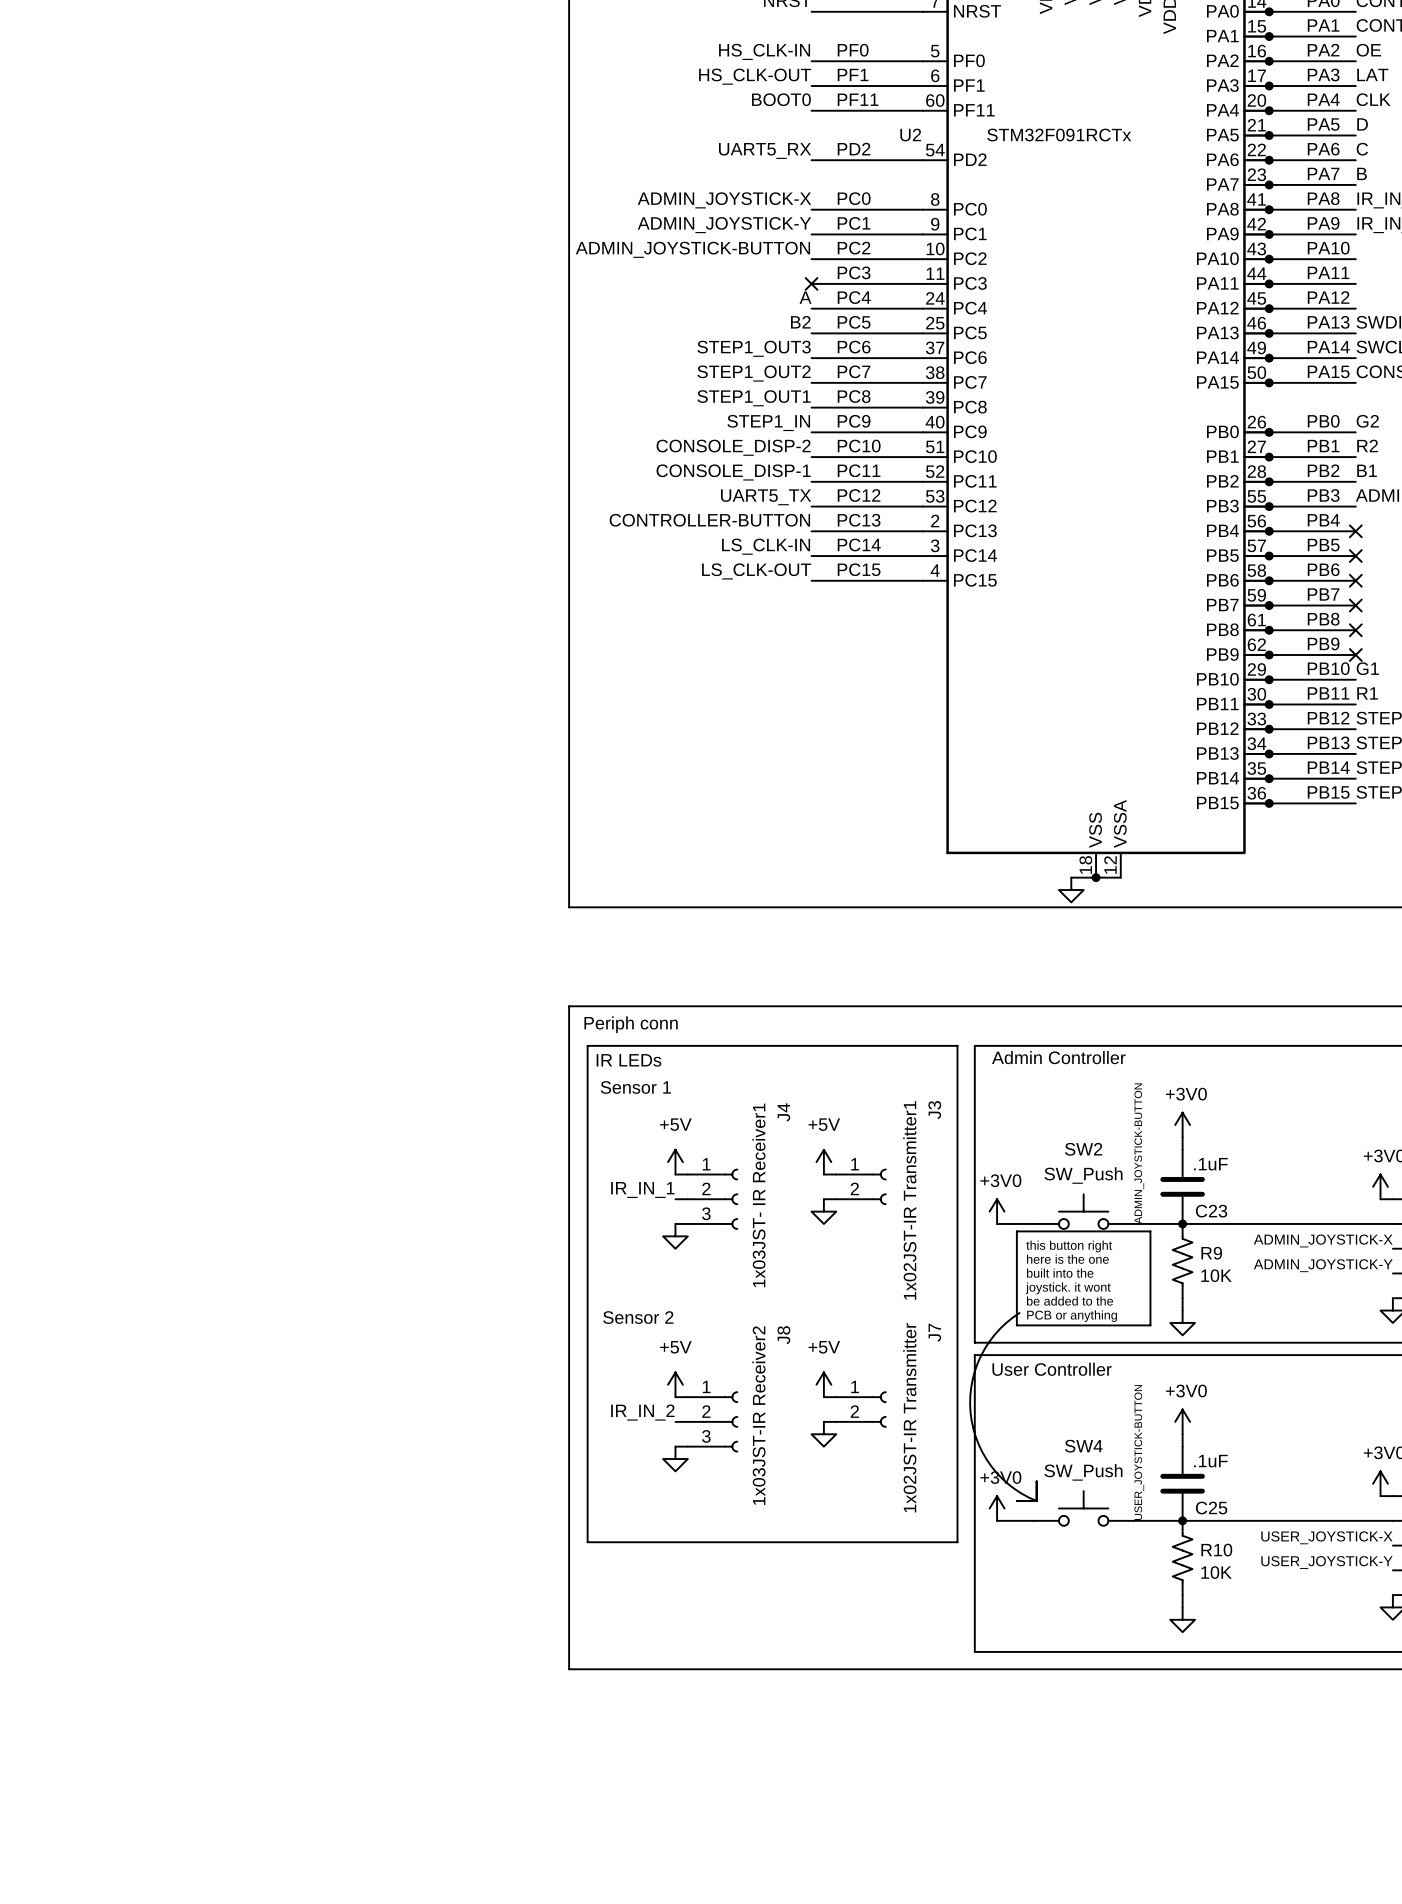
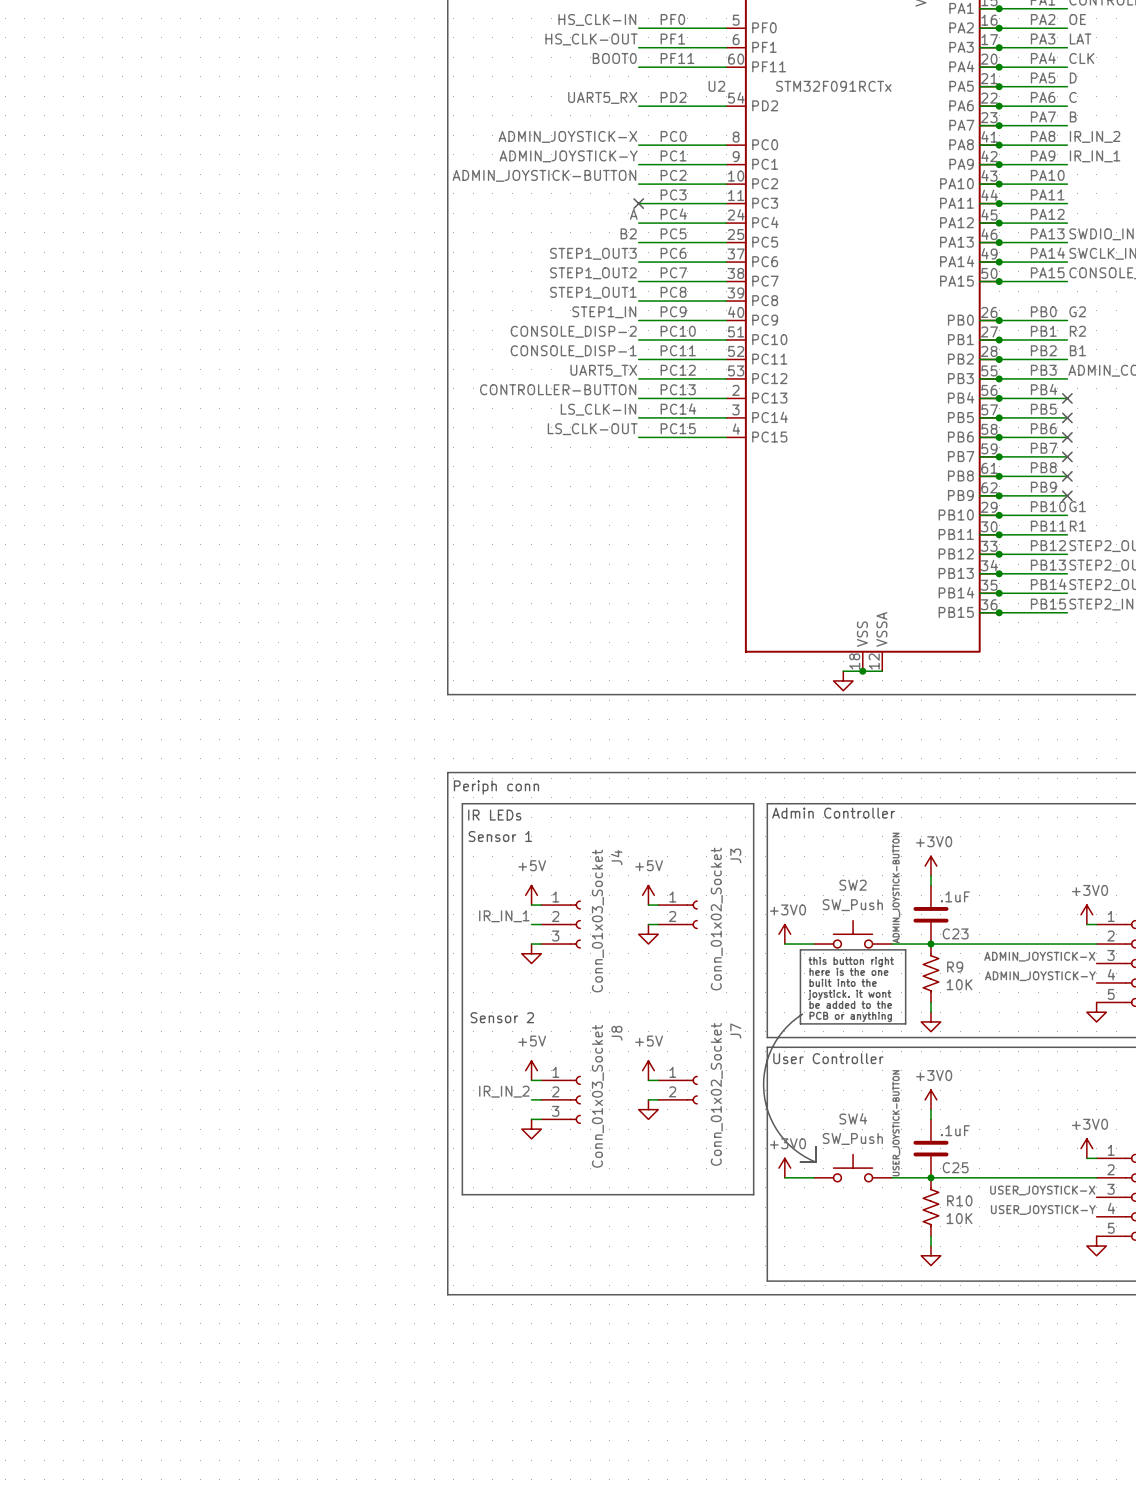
J4 value: 1x03JST- IR Receiver1 (758, 1195) -> Conn_01x03_Socket (597, 920)
J3 value: 1x02JST-IR Transmitter1 (909, 1200) -> Conn_01x02_Socket (716, 919)
J8 value: 1x03JST-IR Receiver2 (758, 1415) -> Conn_01x03_Socket (597, 1096)
J7 value: 1x02JST-IR Transmitter (909, 1417) -> Conn_01x02_Socket (716, 1094)

